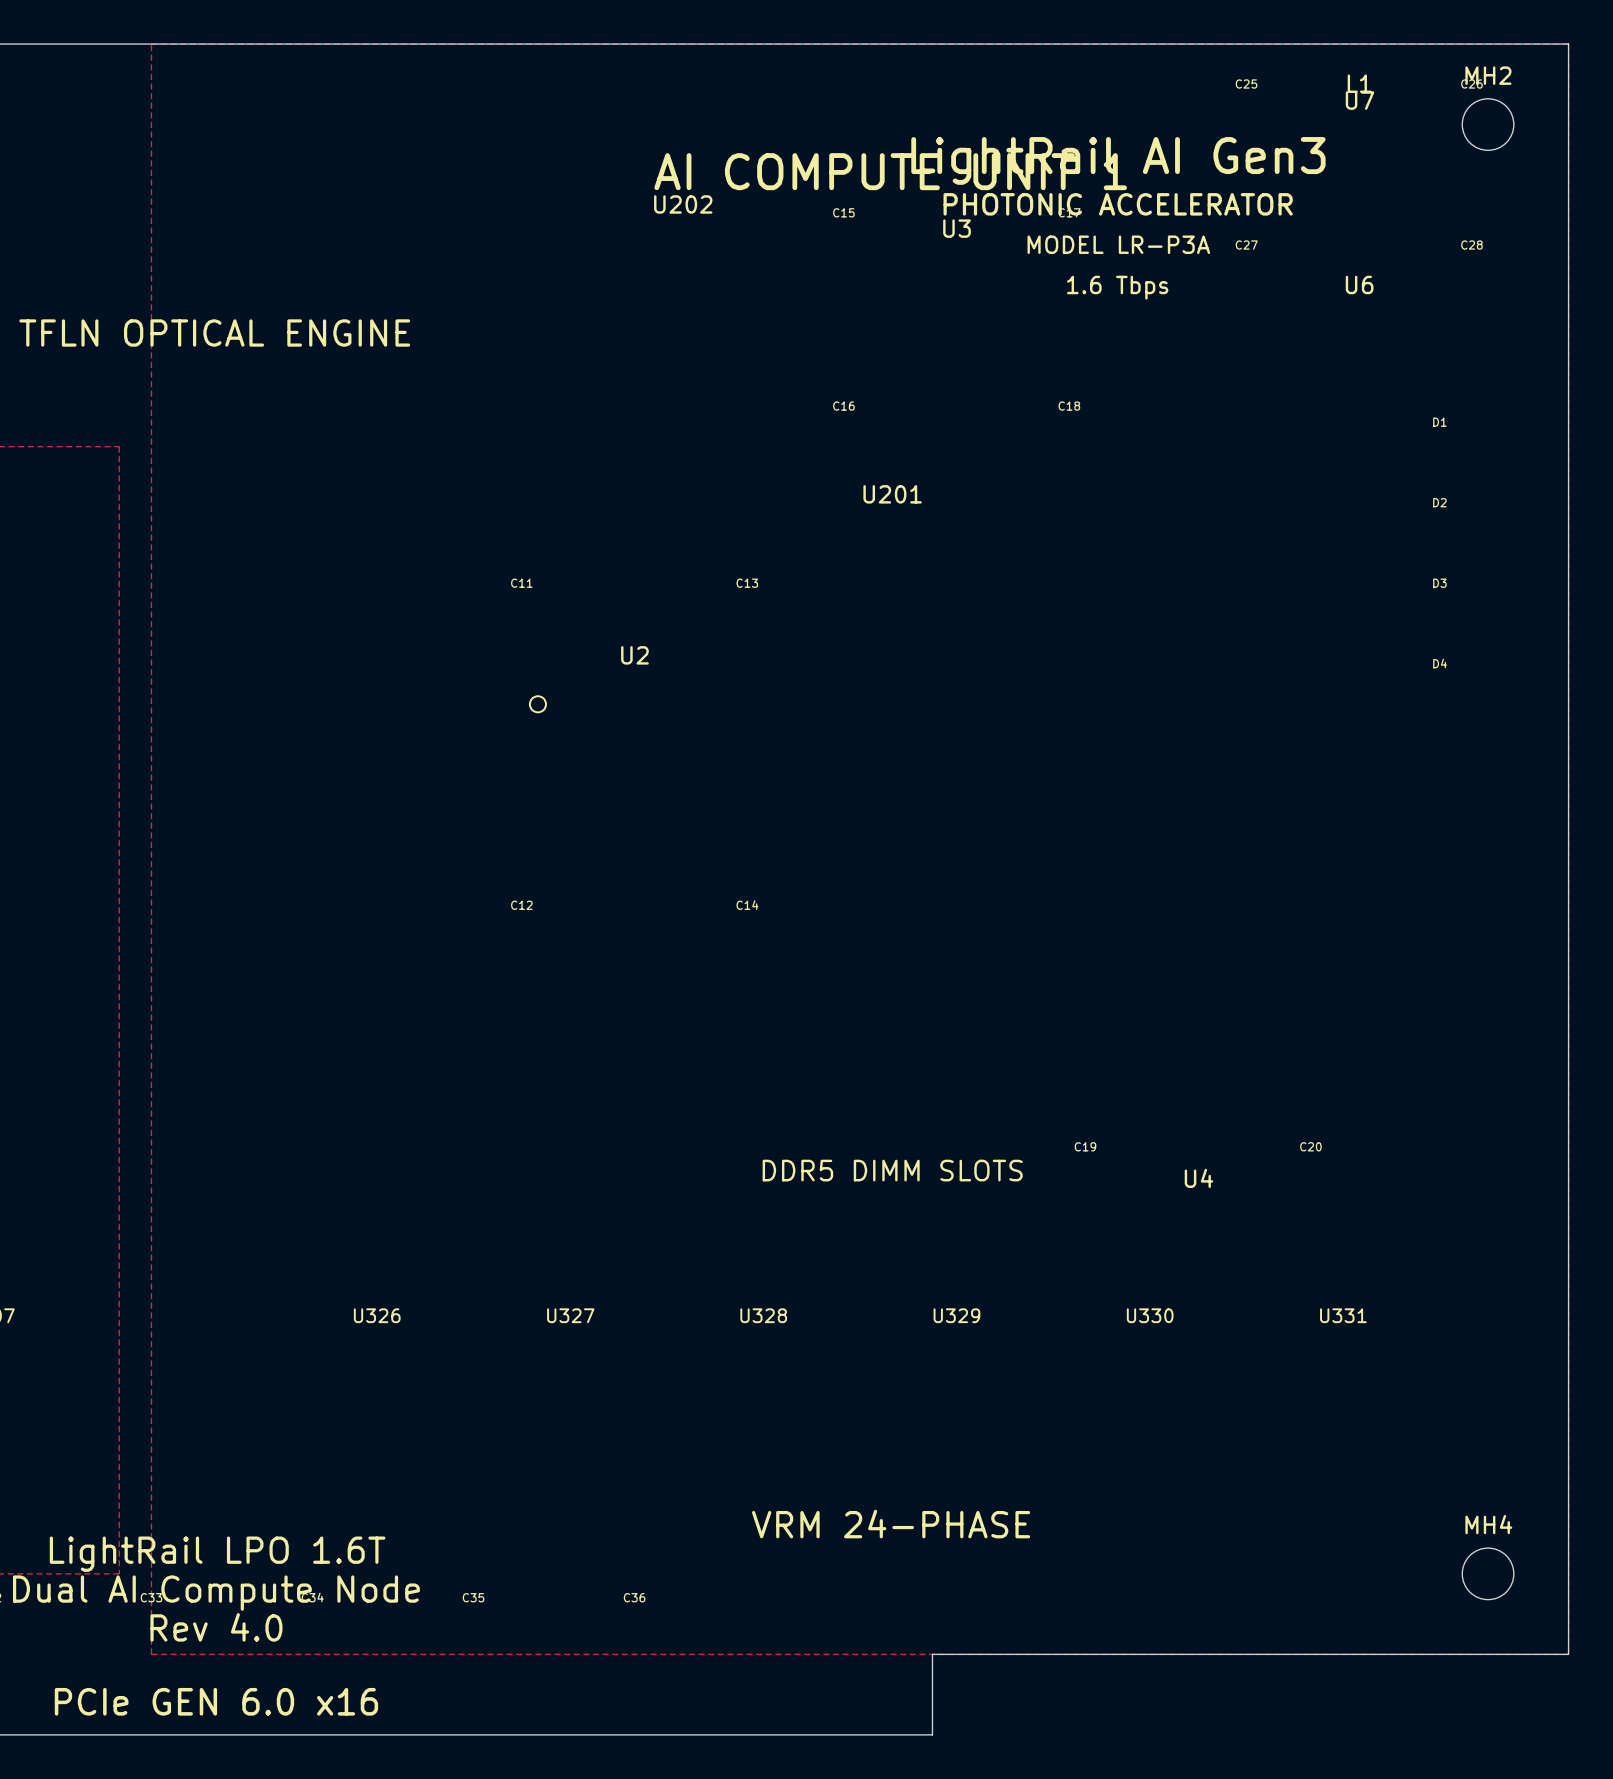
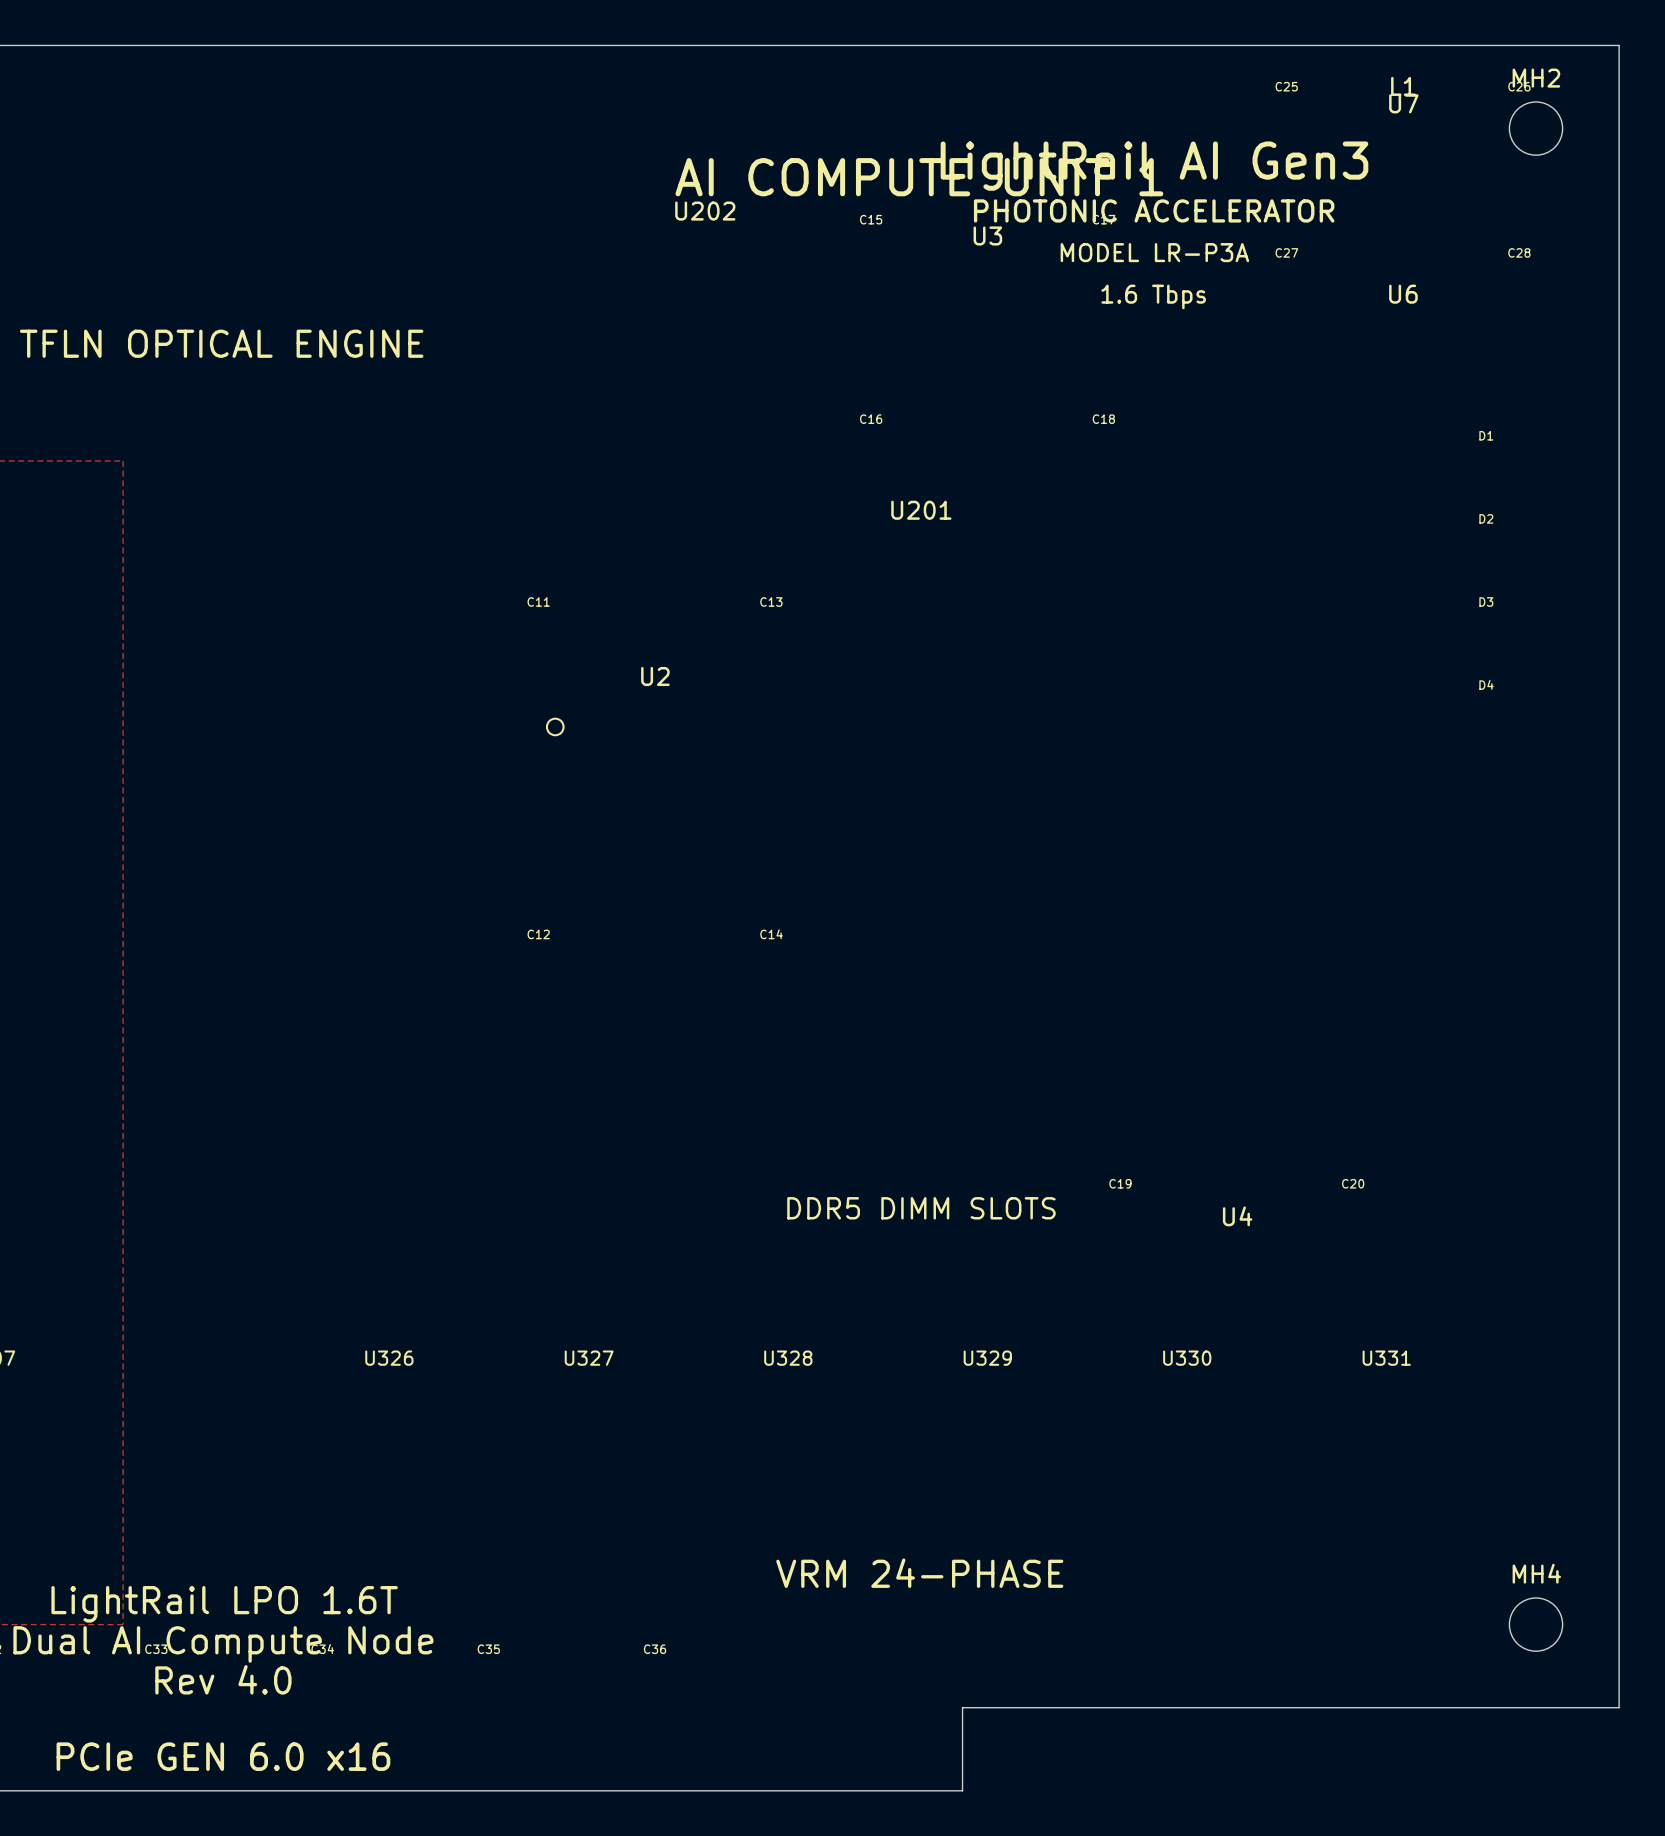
zone outline: (151, 44) (1568, 44) (1568, 1654) (151, 1654) (151, 44) -> none

